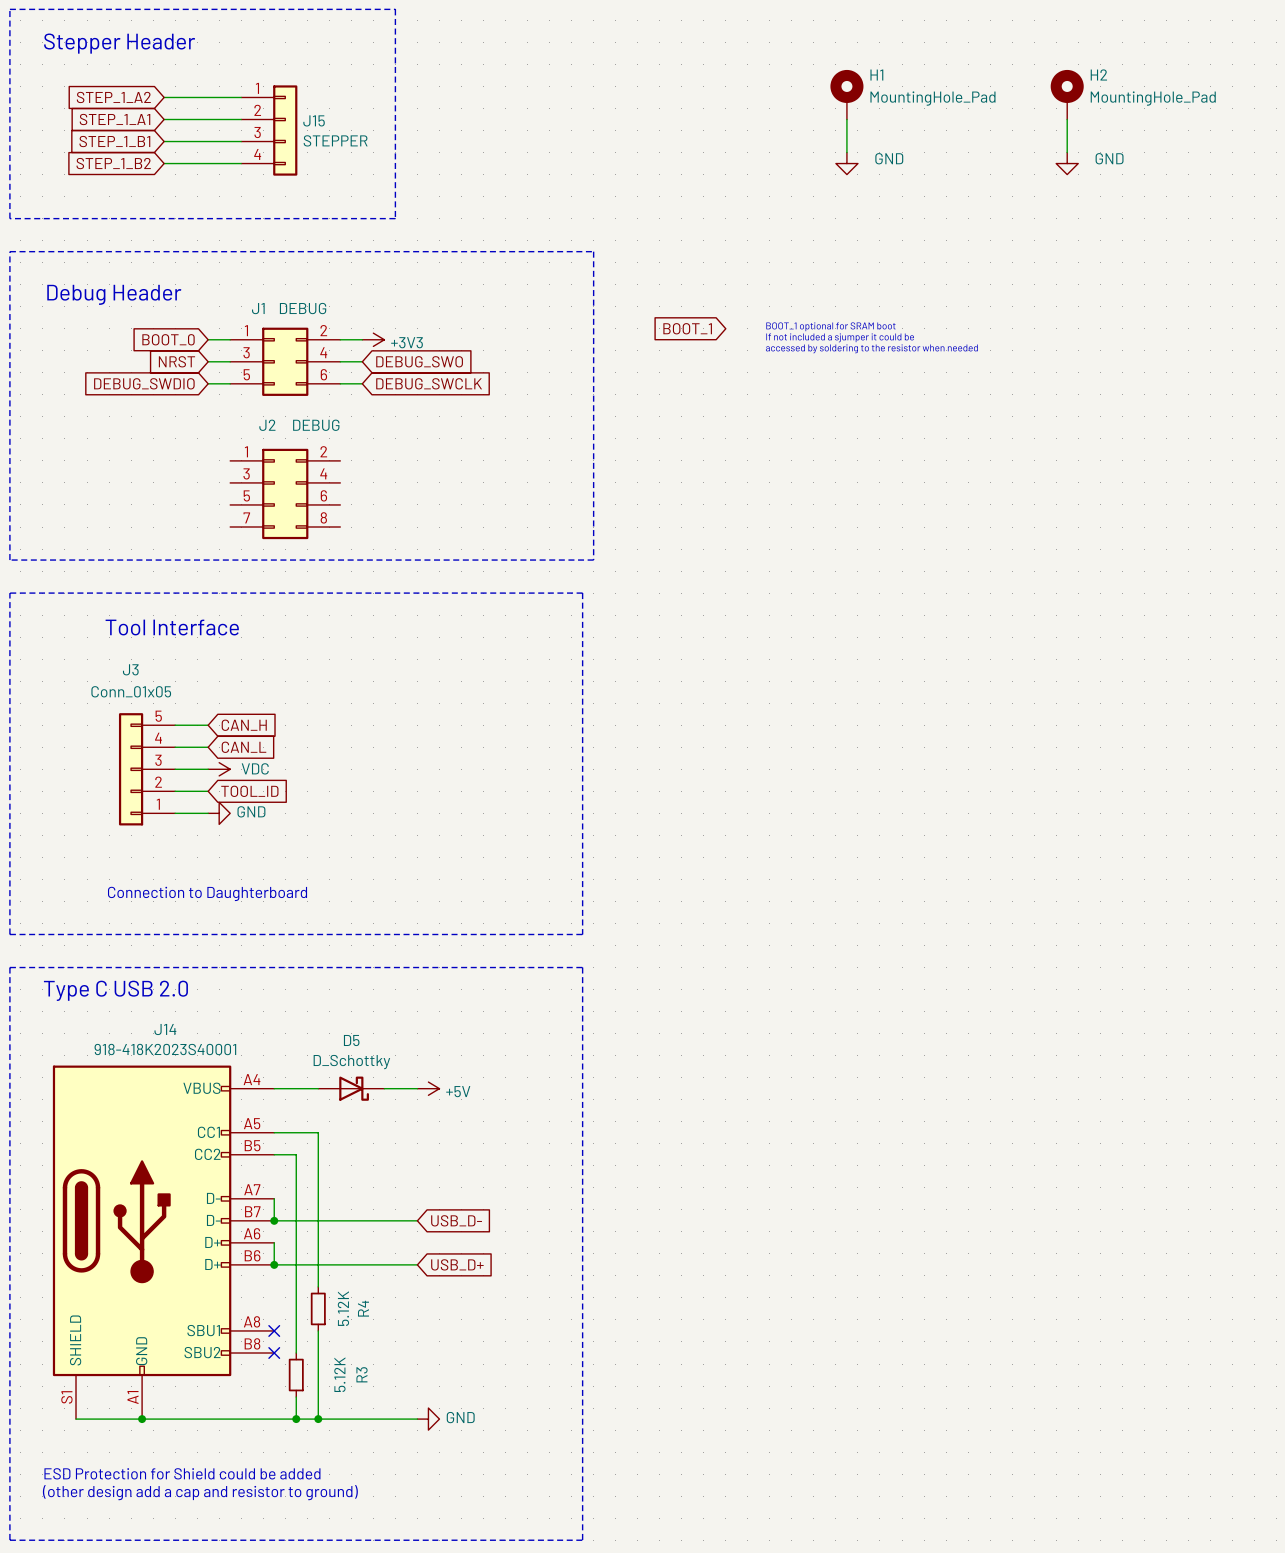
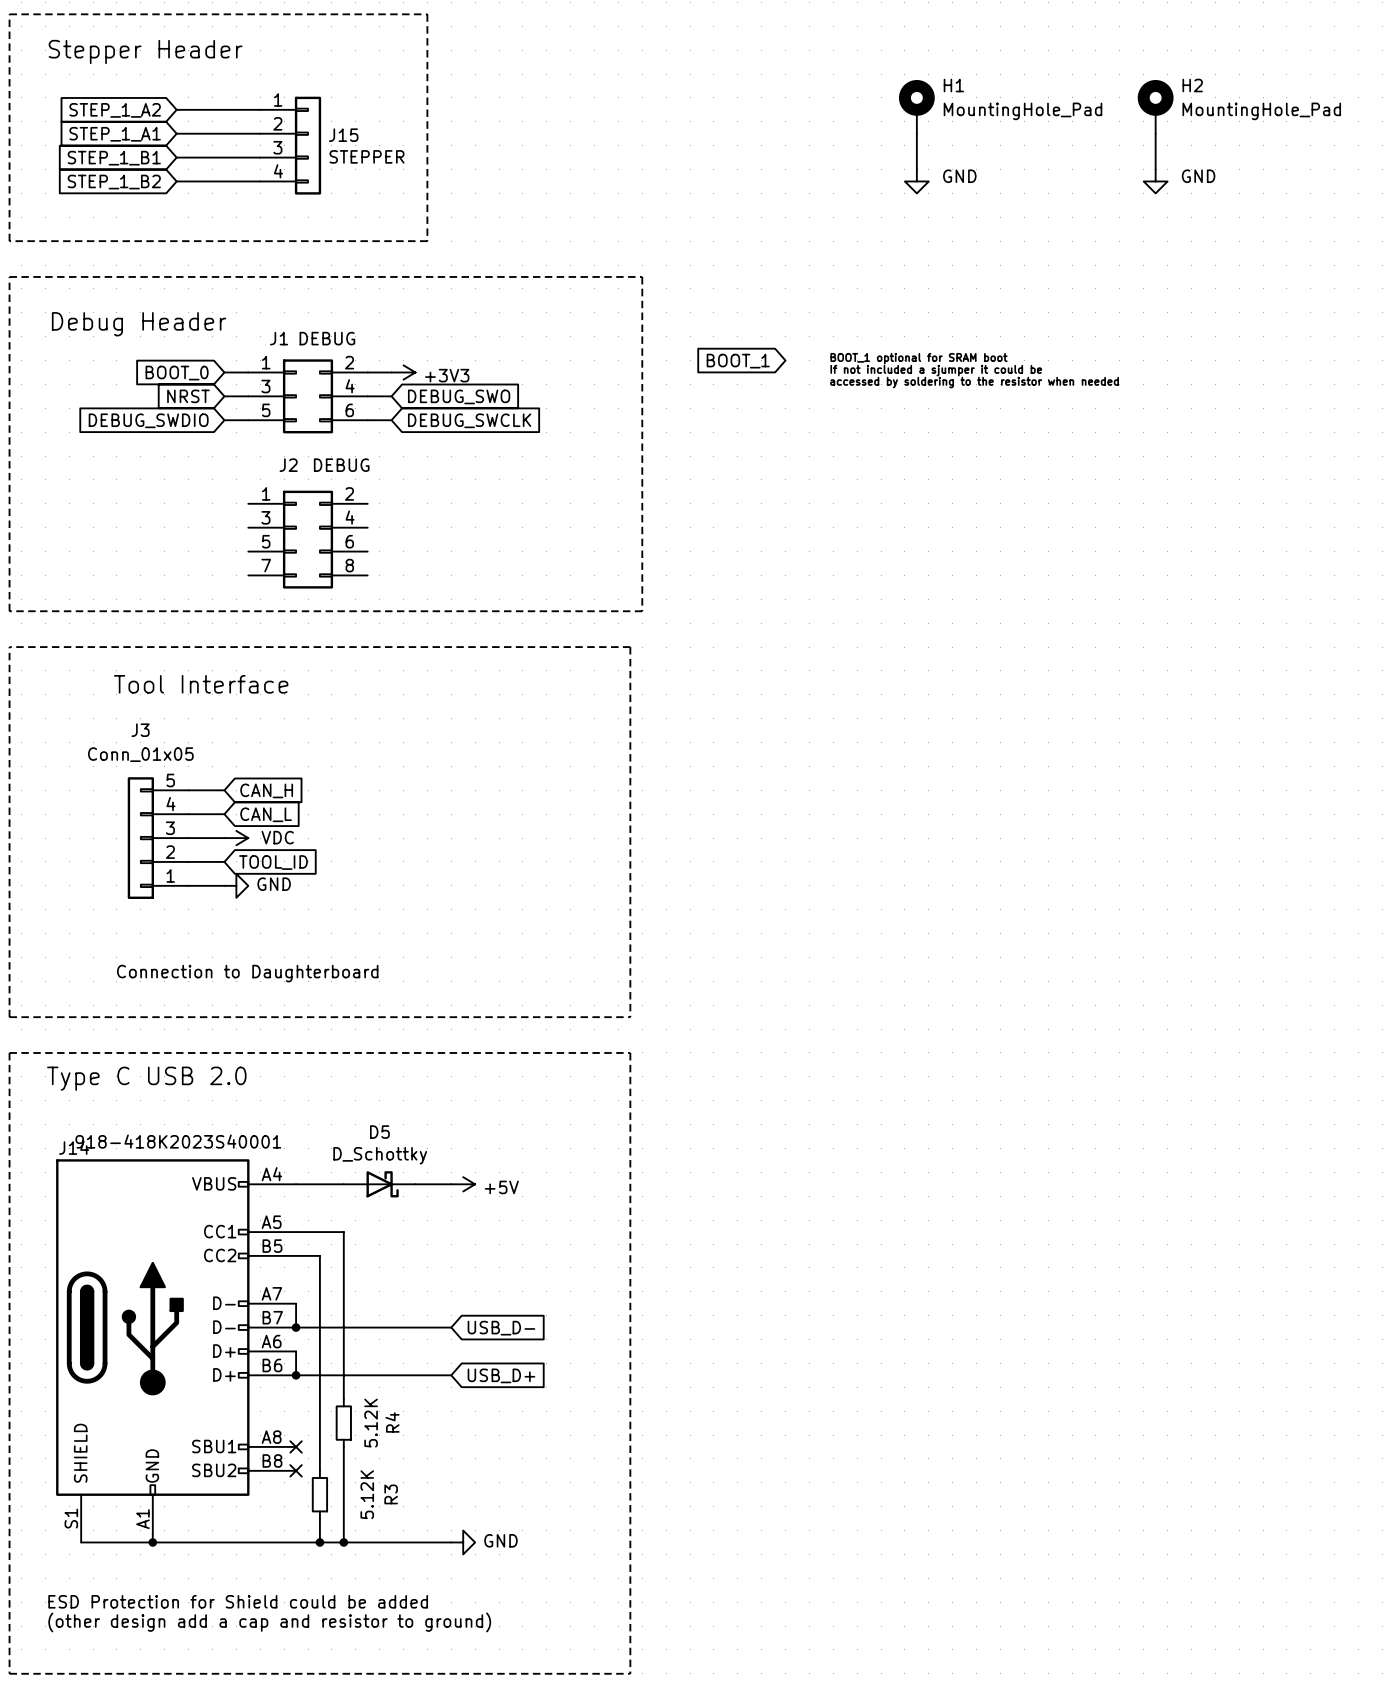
J14 name position: J14 (165, 1029) -> J14 (74, 1147)

